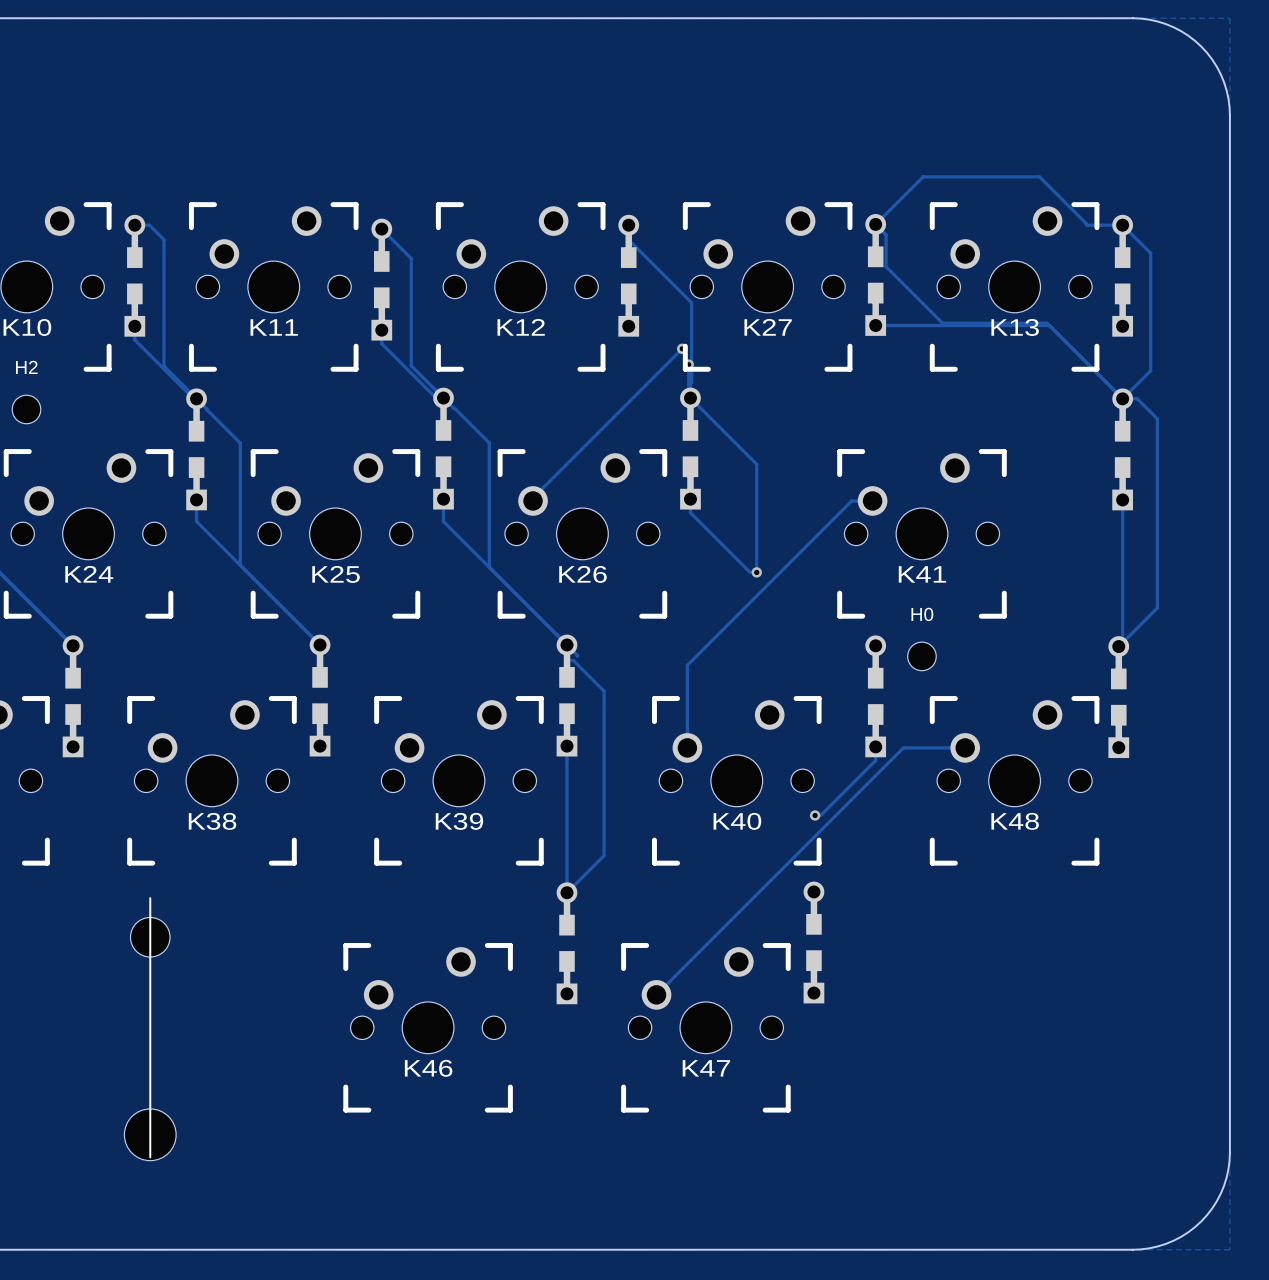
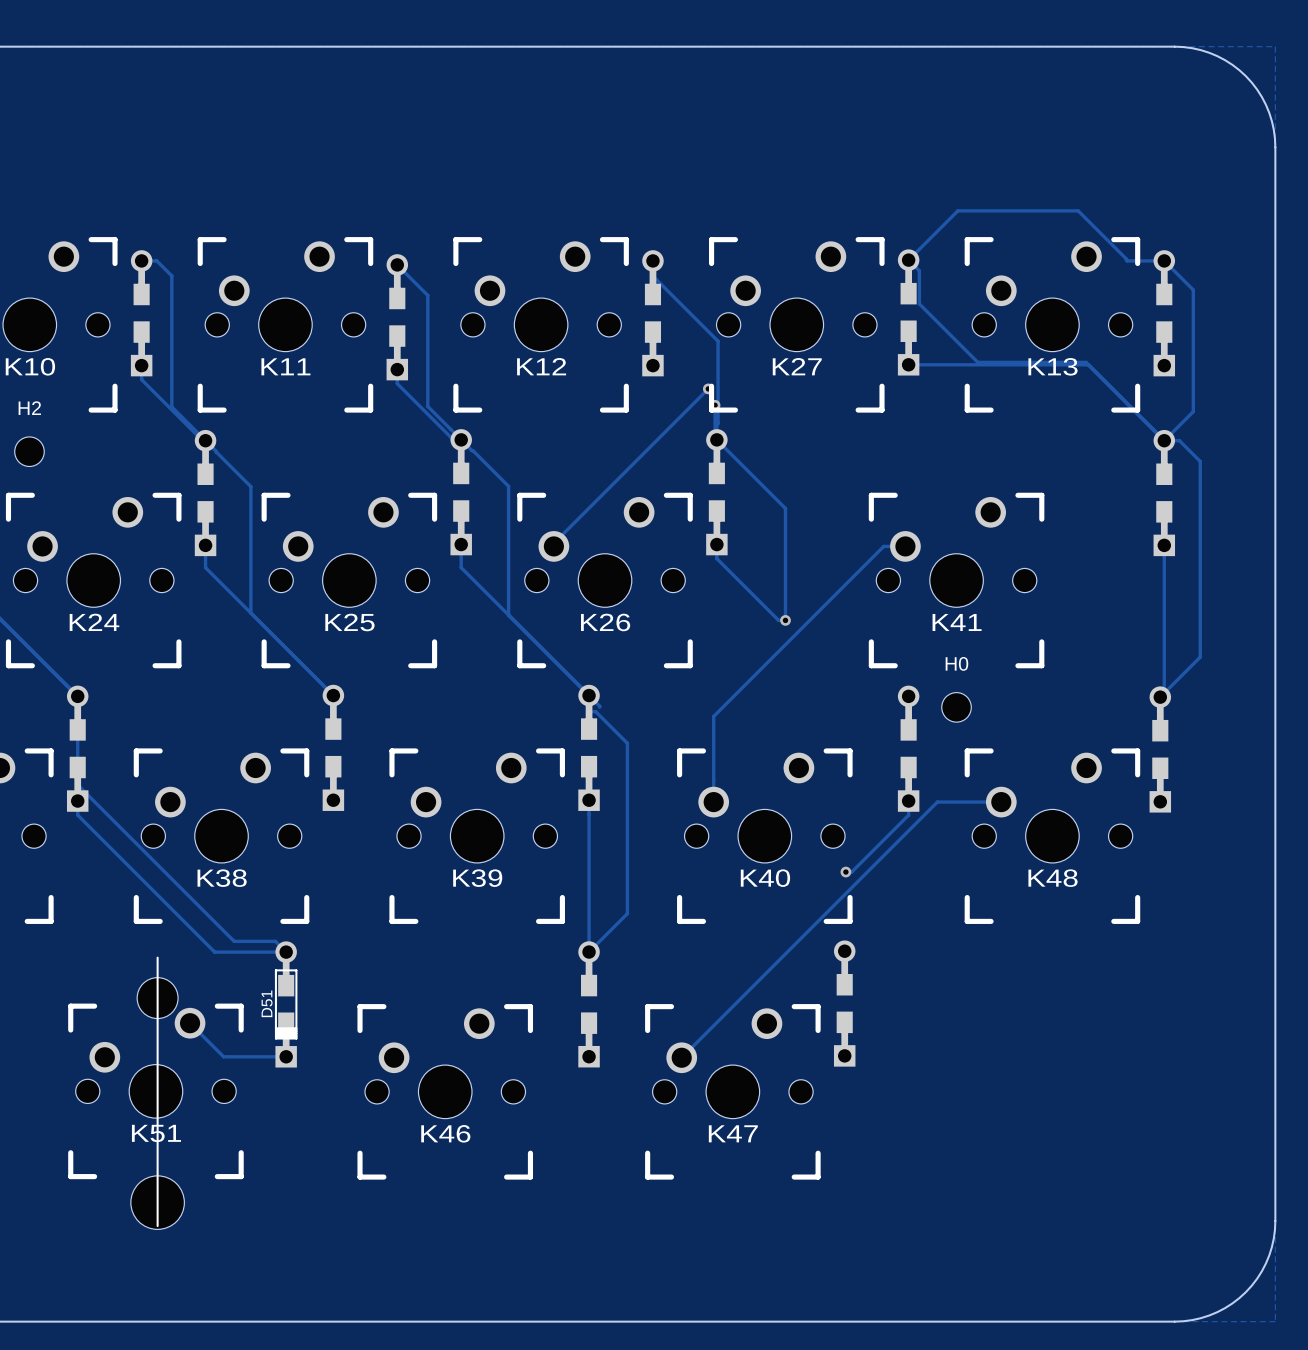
track: none -> (77, 696) (77, 784) (234, 941) (275, 941) (286, 952) (214, 952) (77, 815) (77, 801)
D51: none -> (286, 1004)
track: none -> (190, 1023) (223, 1056) (286, 1056)
K51: none -> (155, 1091)

